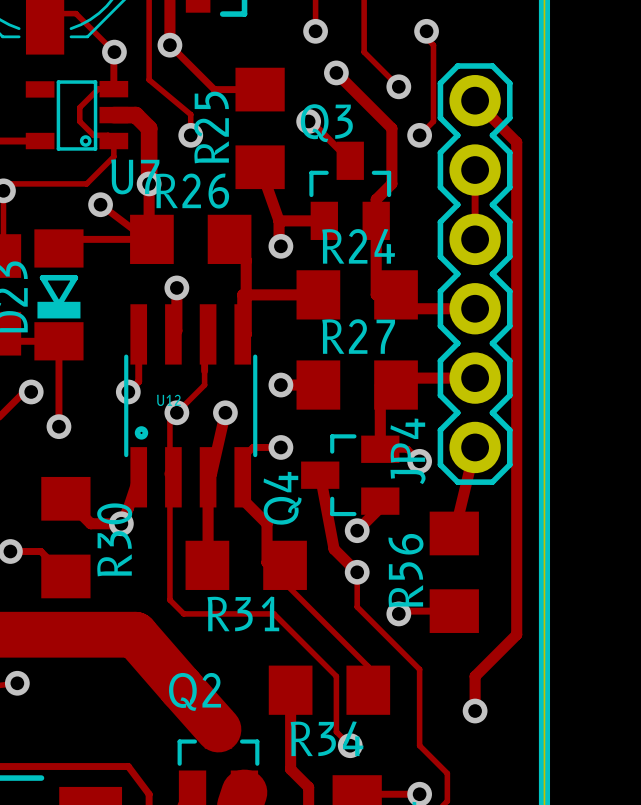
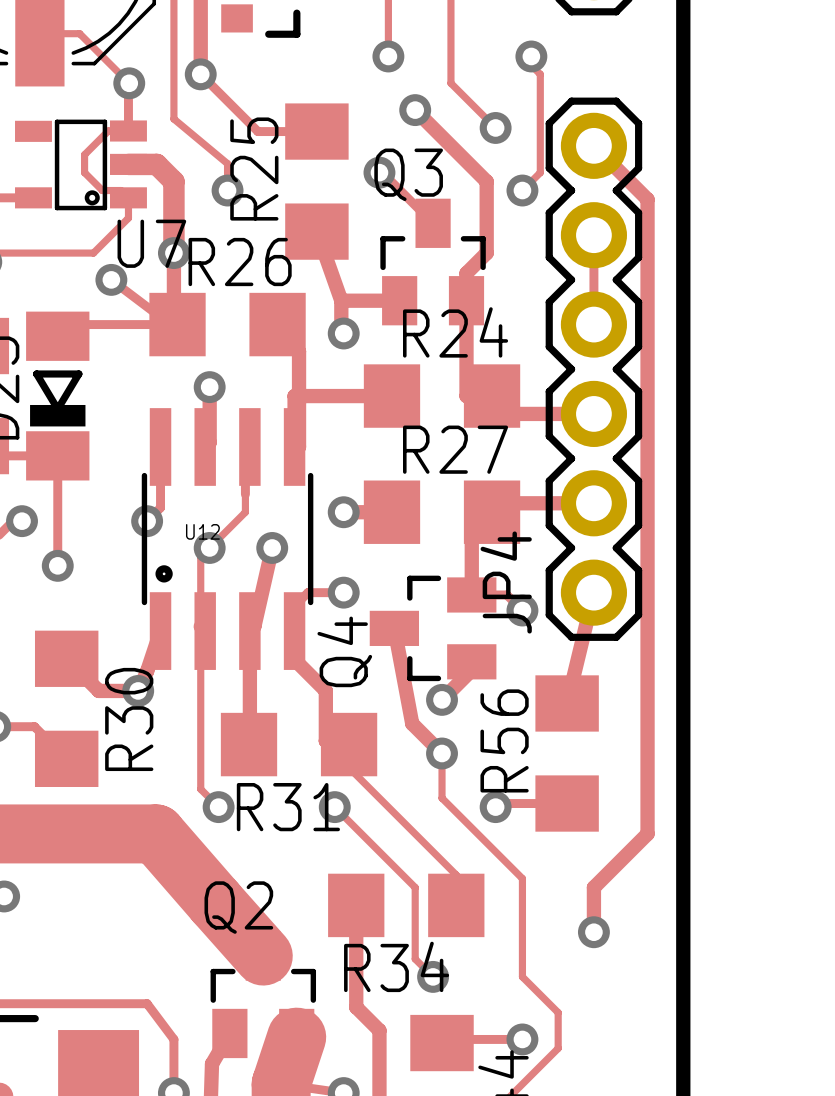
track: (183, 613) (273, 613) -> none
via: none -> (218, 807)
via: none -> (334, 807)

